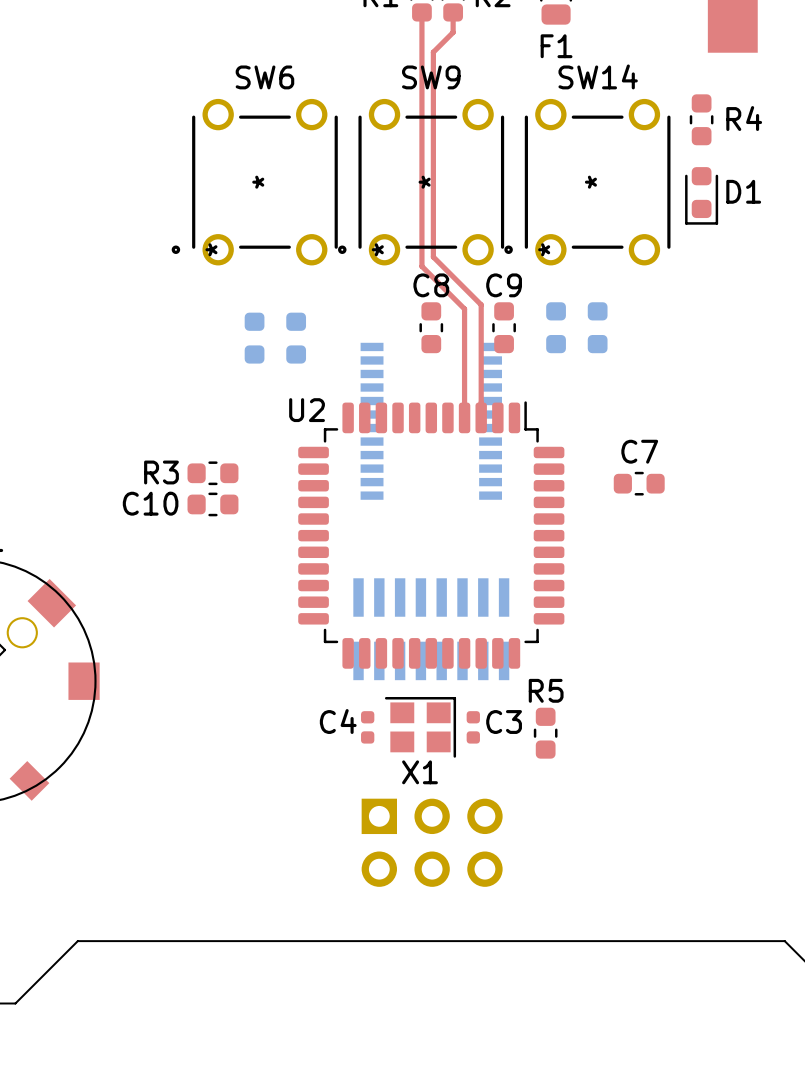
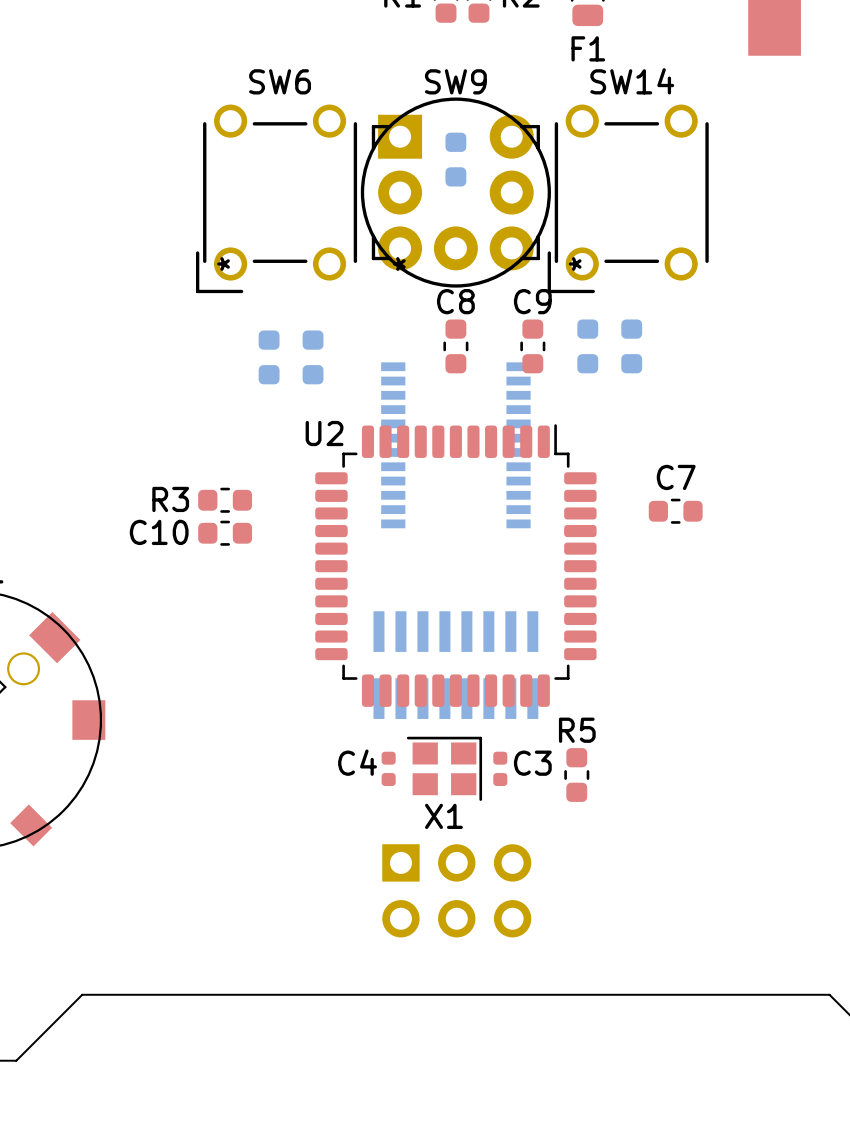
top track: (421, 12) (421, 266) (464, 309) (464, 417) -> none
top track: (453, 12) (453, 32) (433, 52) (433, 257) (481, 304) (481, 417) -> none
SW6 footprint: [171, 98, 338, 266] -> [196, 104, 358, 294]
SW9 footprint: [338, 98, 505, 266] -> [360, 97, 551, 288]
SW14 footprint: [504, 98, 671, 266] -> [547, 104, 709, 294]
R4 side: top (701, 119) -> bottom (455, 159)
D1: (701, 195) -> none

